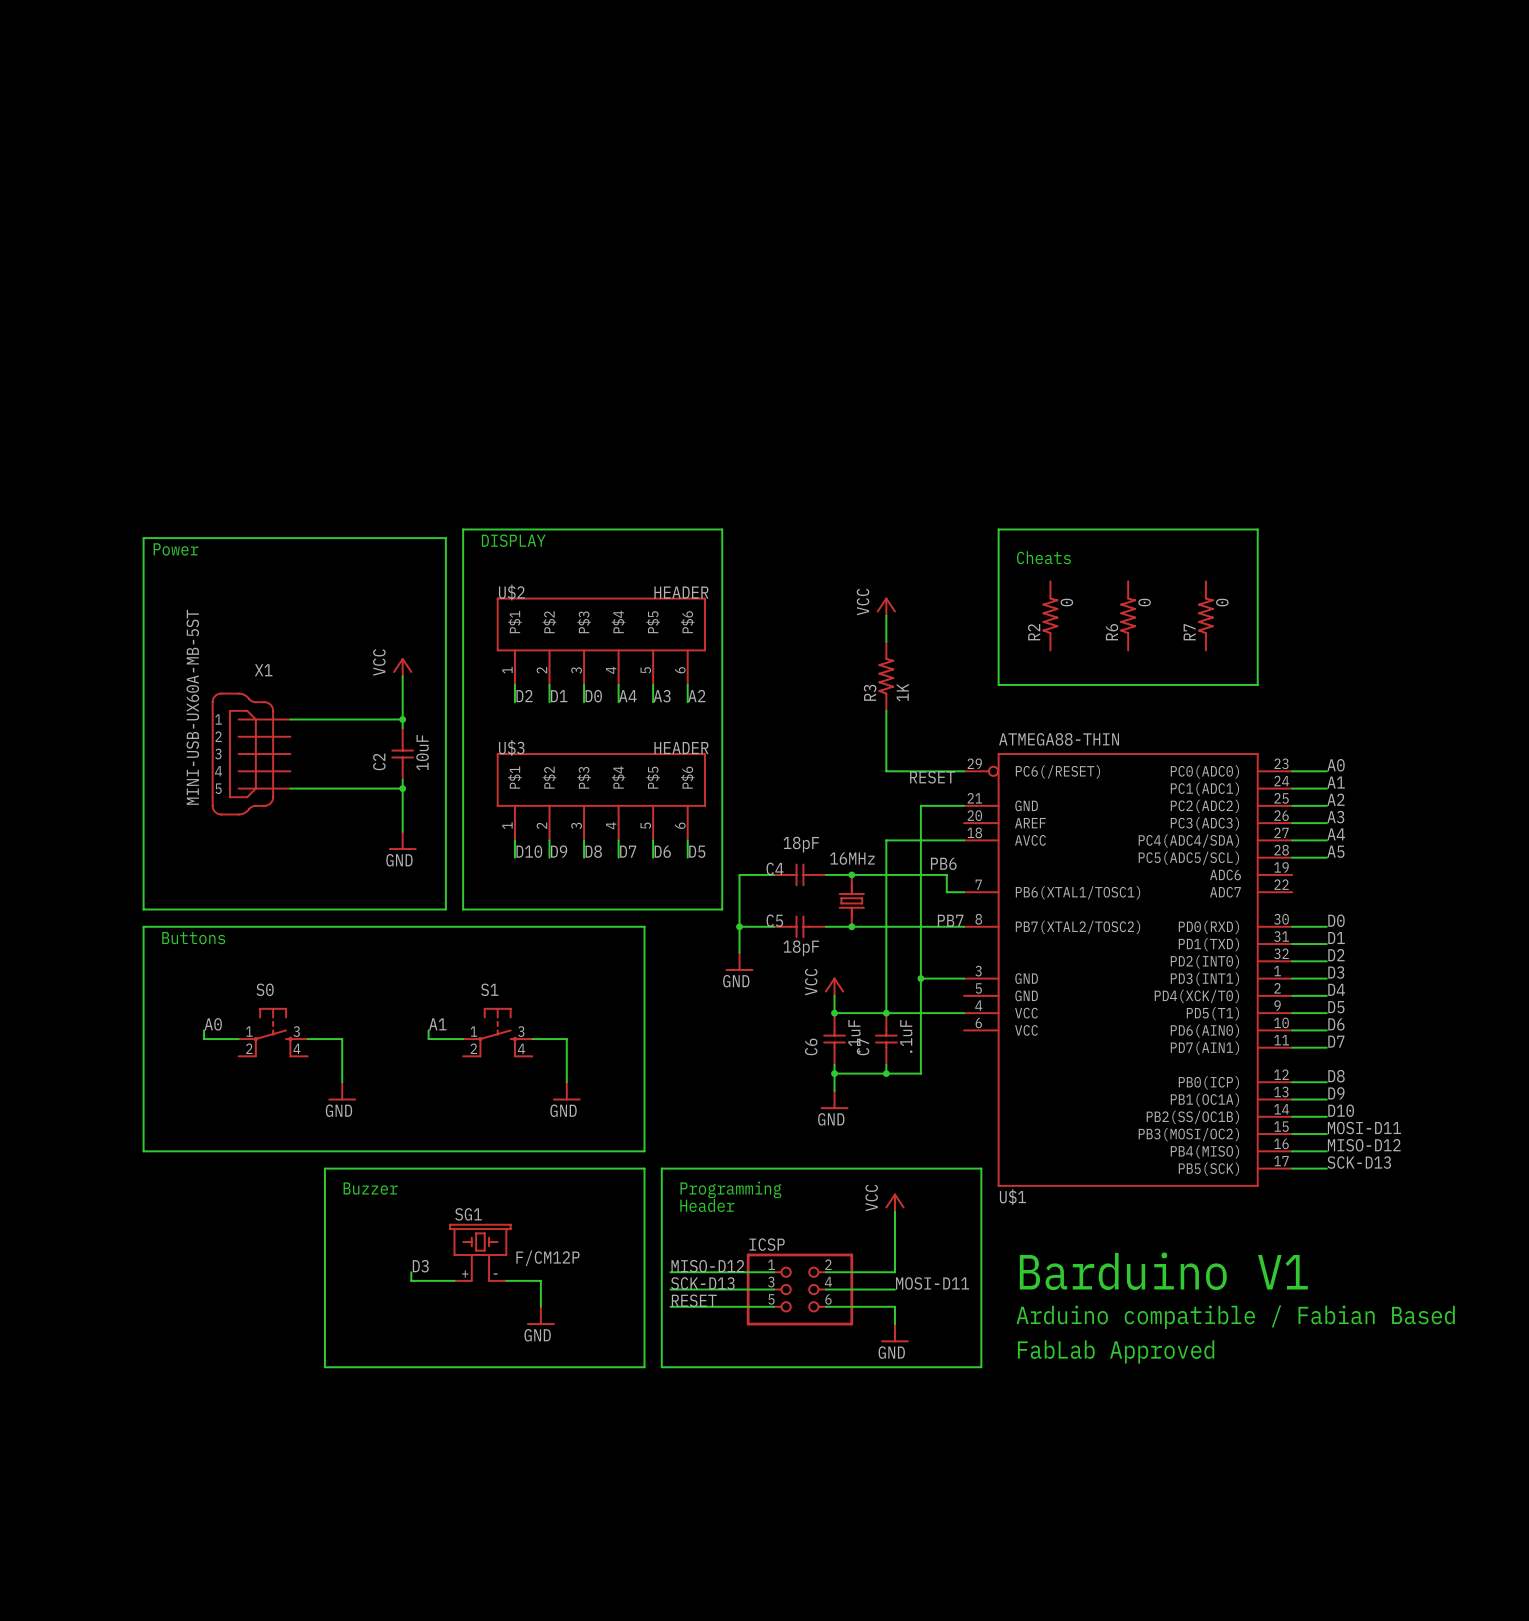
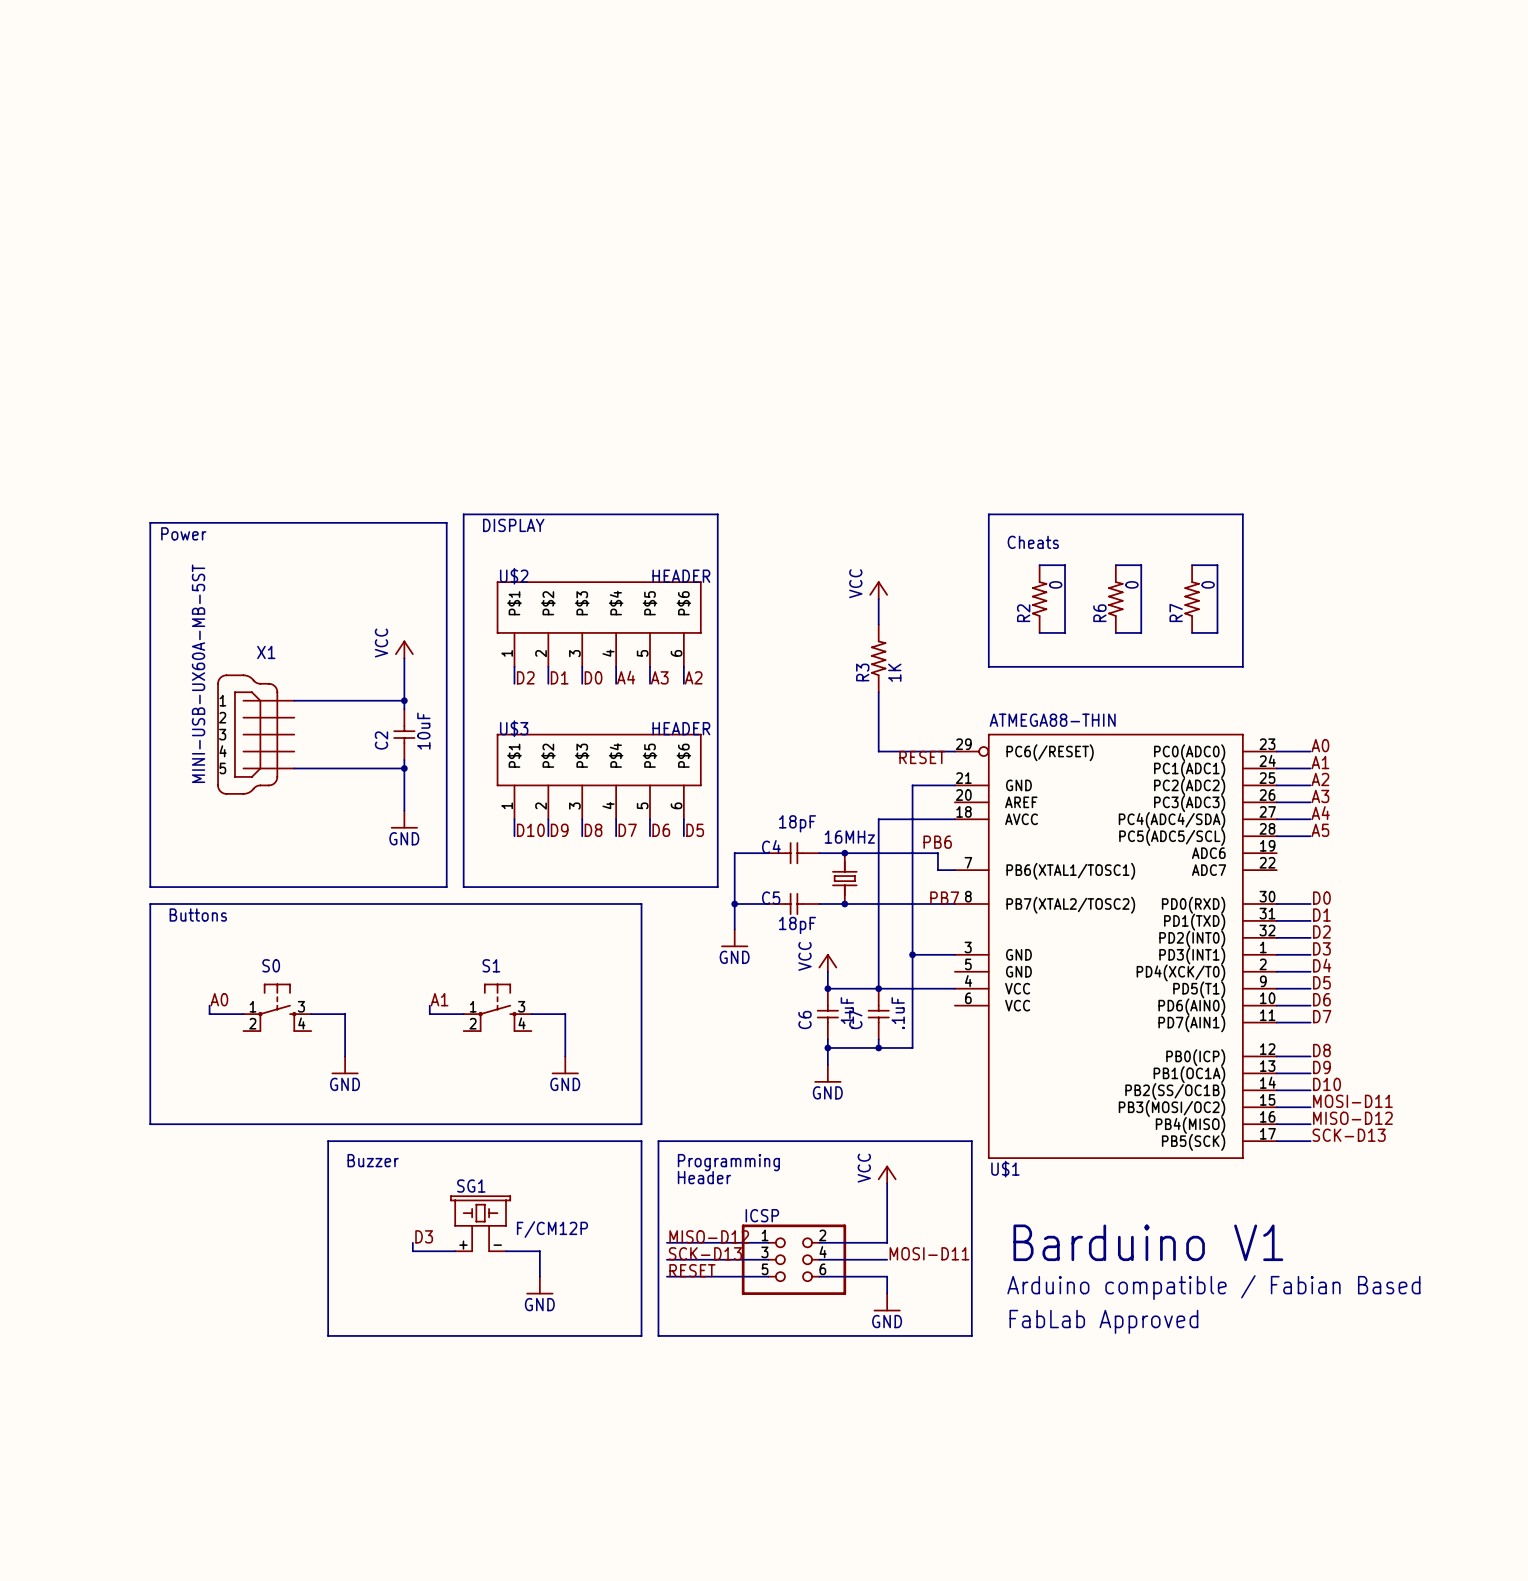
wire: none -> (1039, 565) (1065, 565) (1065, 632) (1039, 632)
wire: none -> (1115, 565) (1141, 565) (1141, 632) (1115, 632)
wire: none -> (1192, 565) (1217, 565) (1217, 632) (1192, 632)

